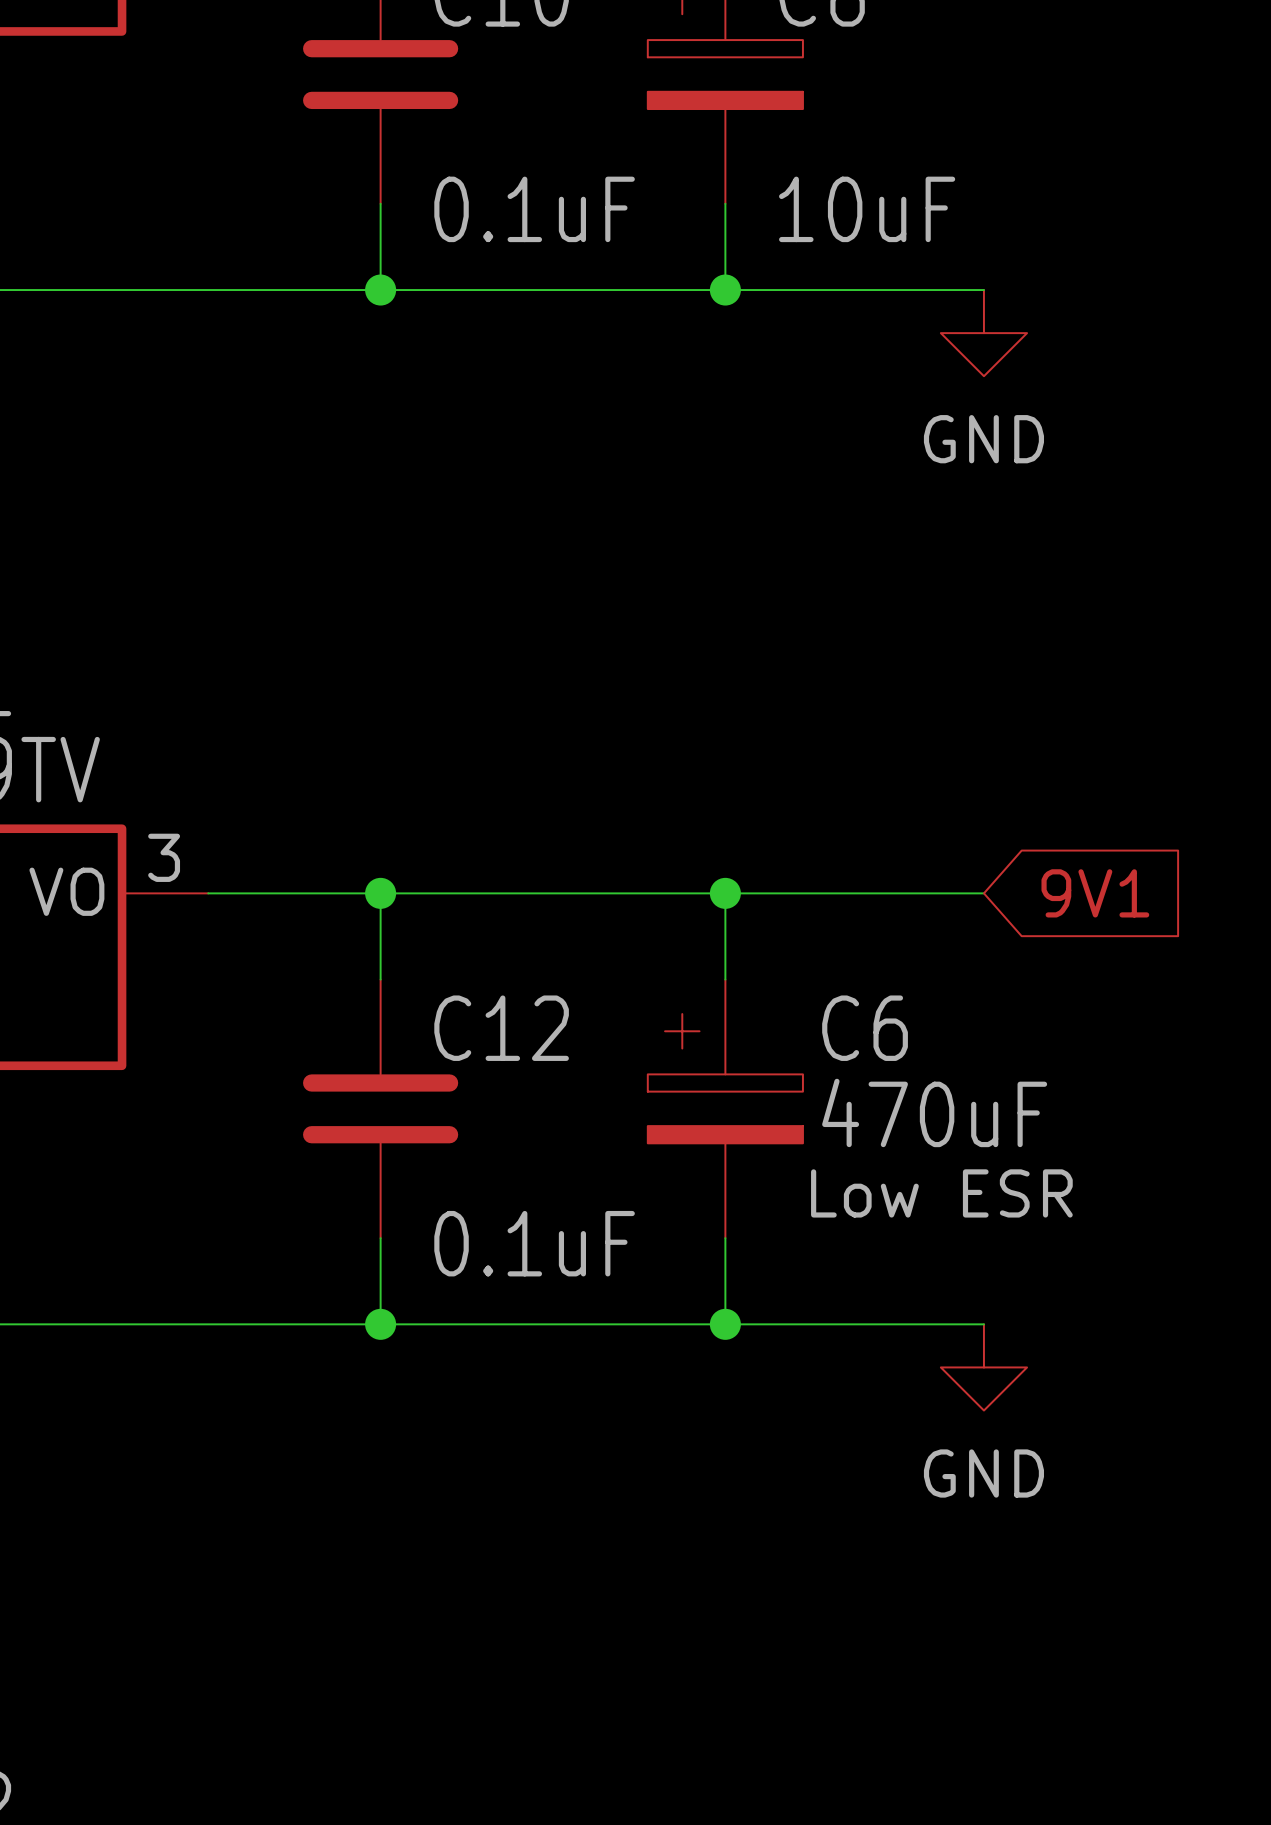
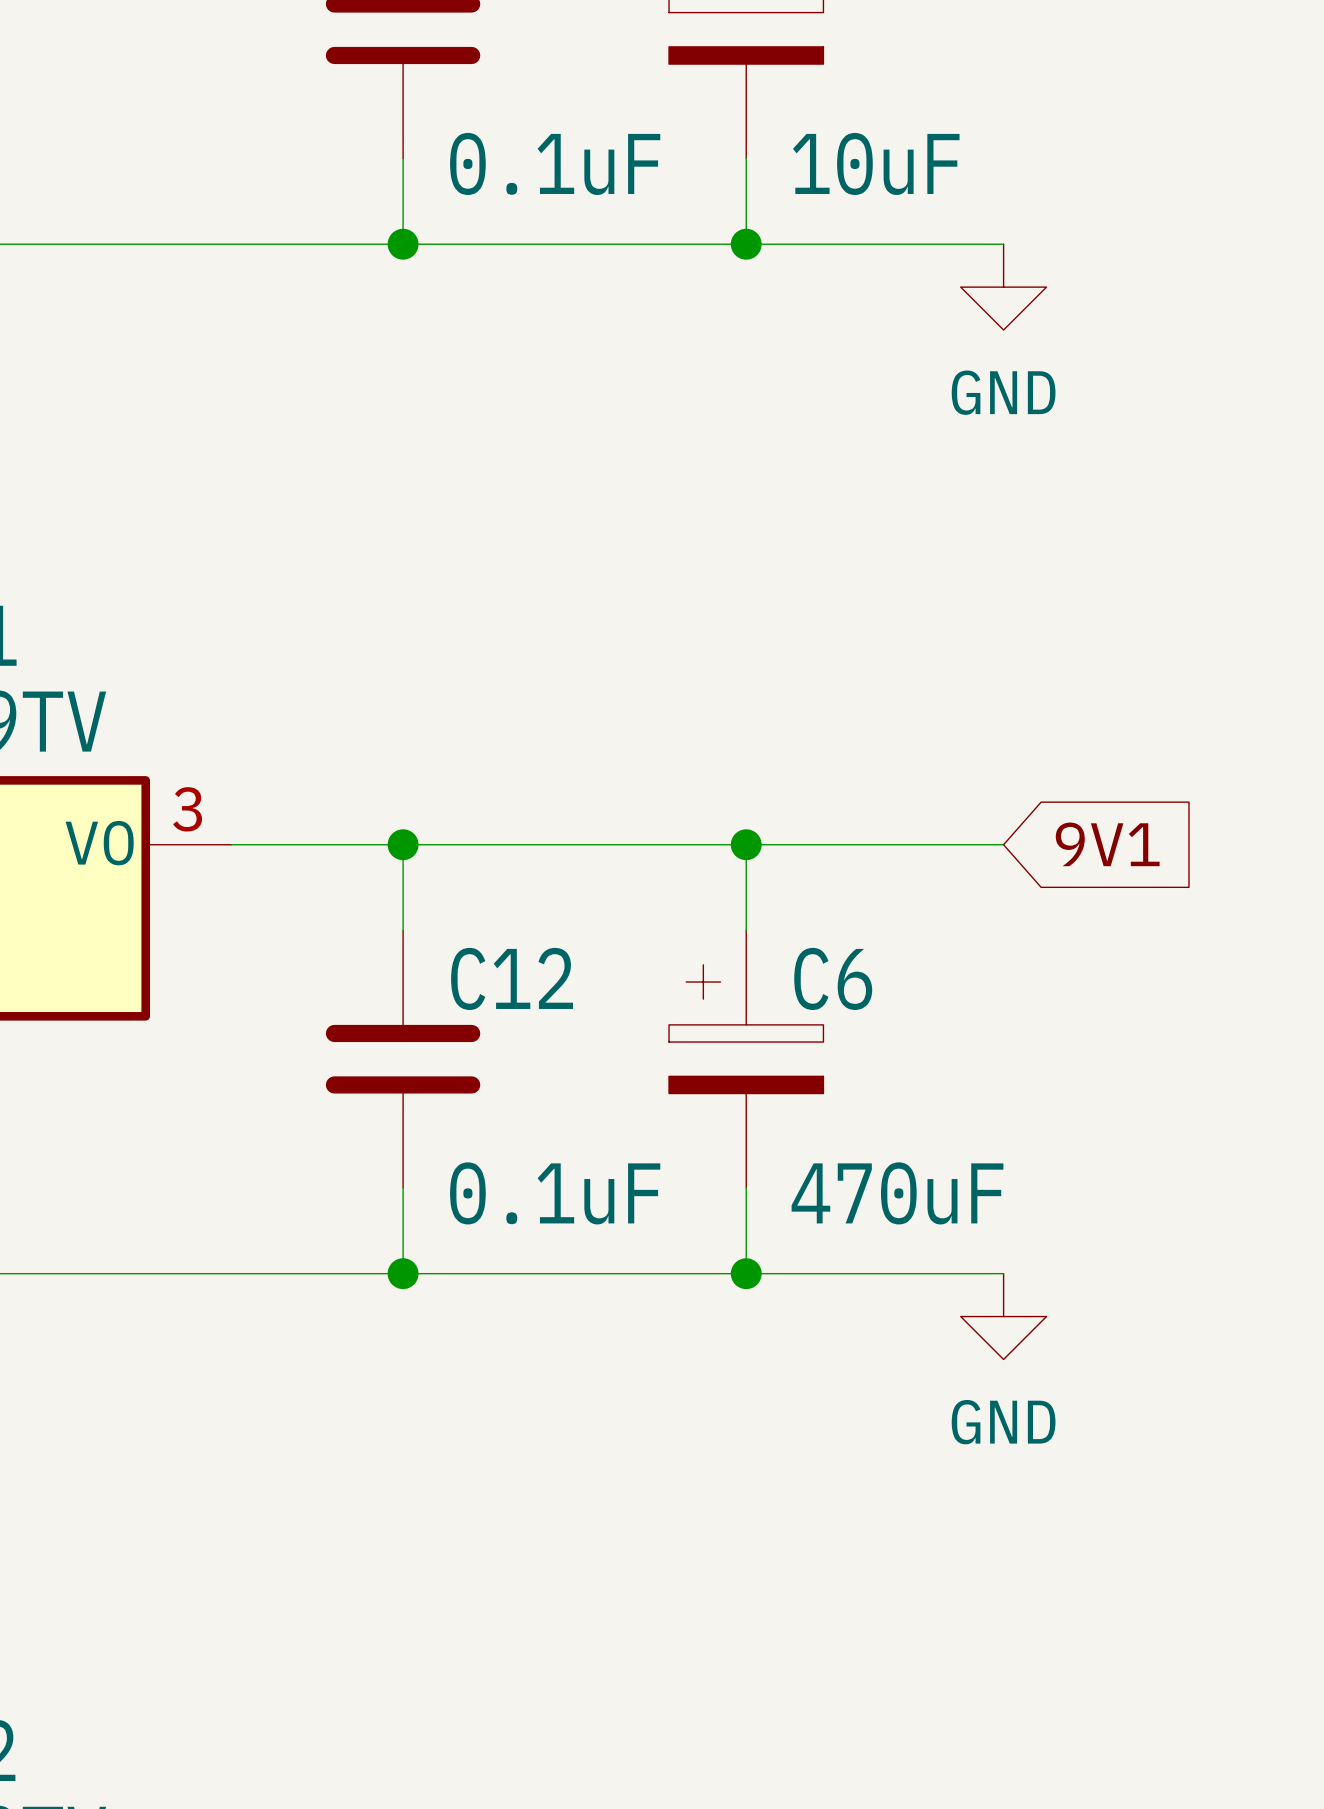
C6 name position: C6 (865, 1028) -> C6 (833, 978)
C6 value position: 470uF (934, 1112) -> 470uF (897, 1193)
C6 text: Low ESR (941, 1193) -> none

